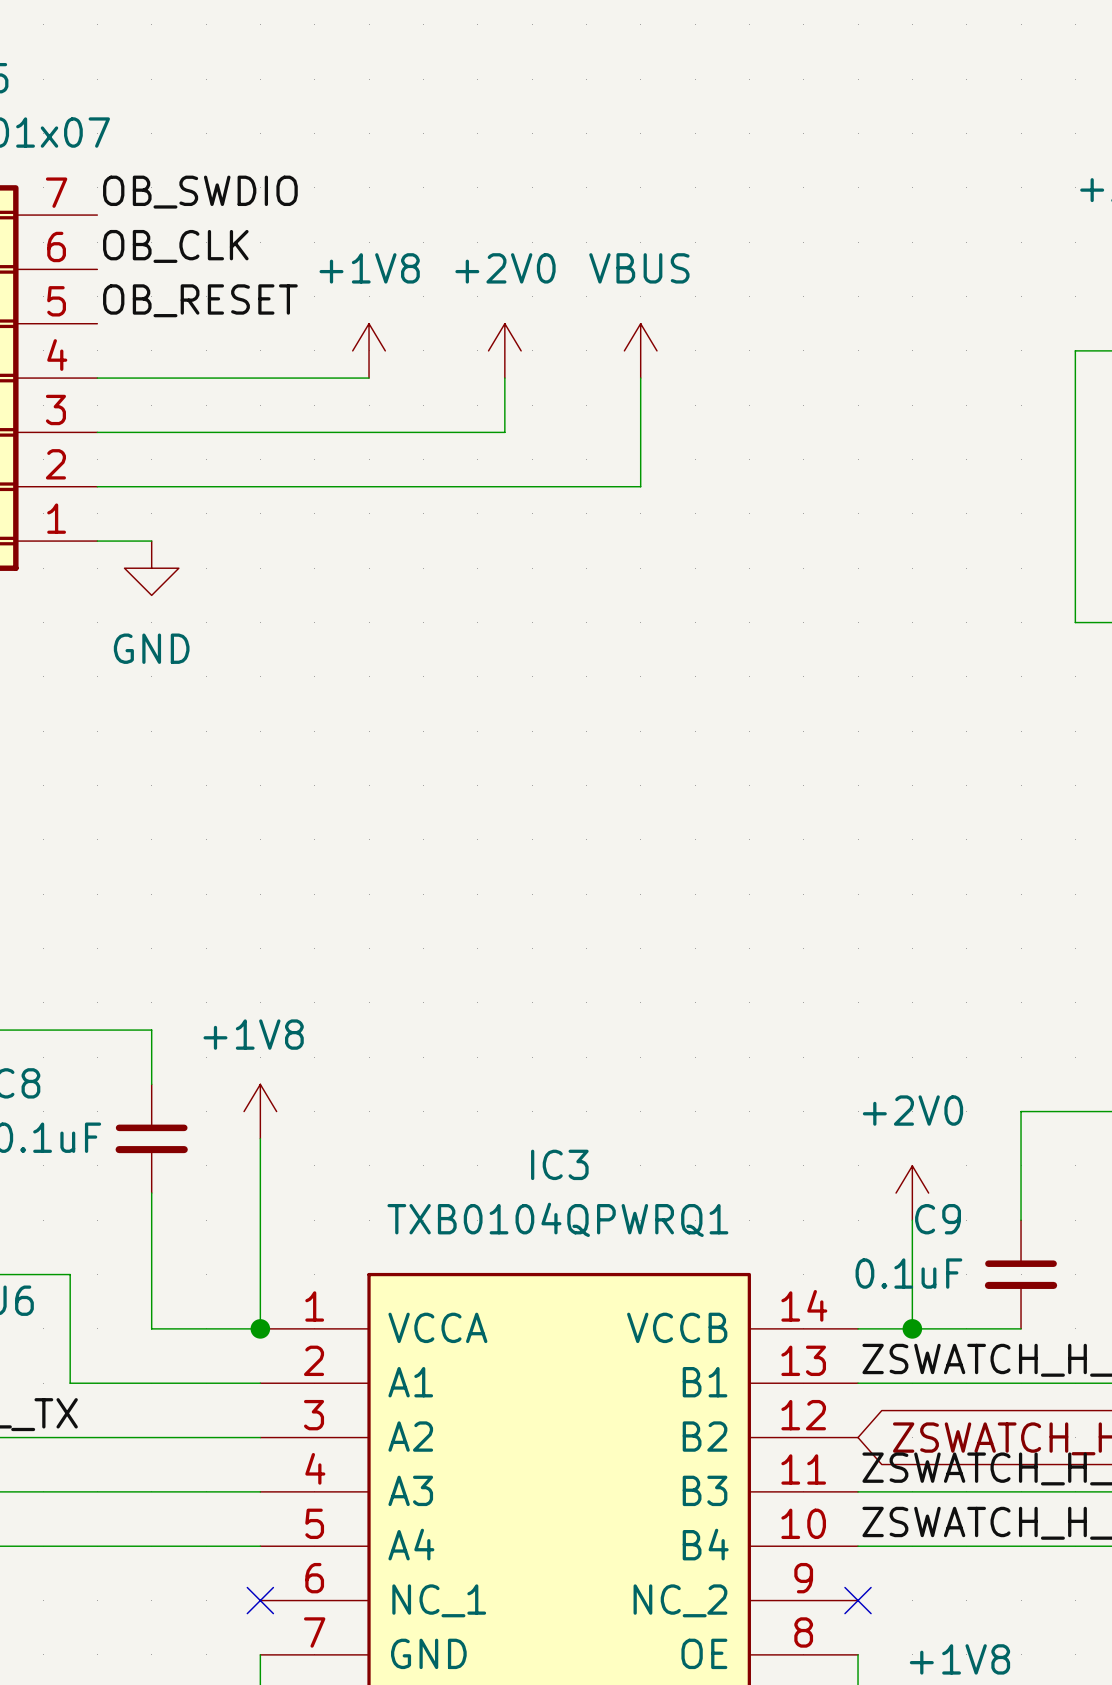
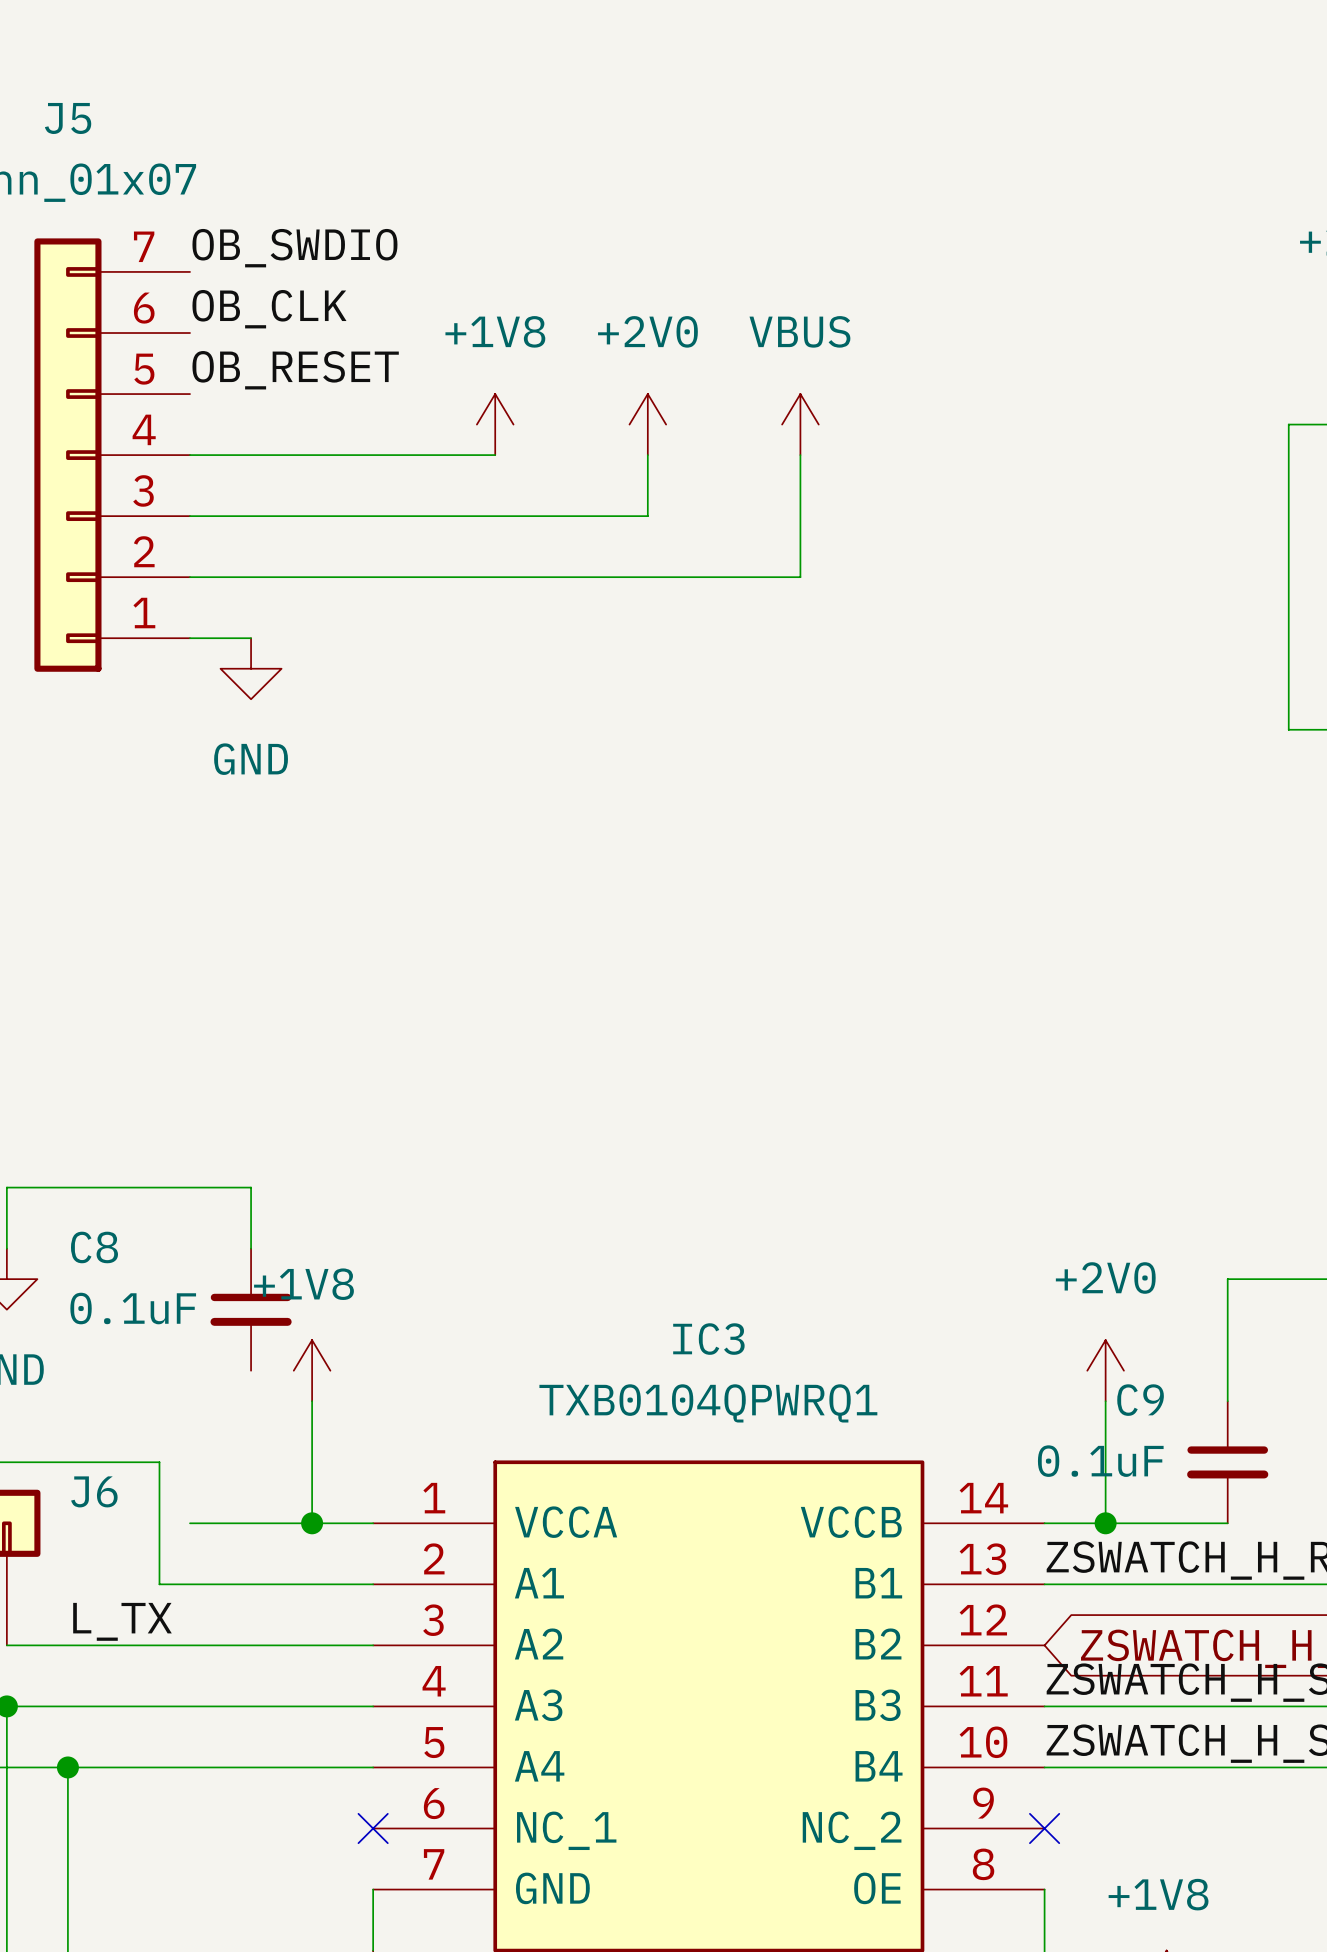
power symbol position: +1V8 (260, 1111) -> +1V8 (312, 1370)
wire: (260, 1138) (260, 1328) -> none
wire: (151, 1193) (151, 1328) -> (190, 1523) (251, 1523)
wire: none -> (312, 1401) (312, 1523)
junction position: (260, 1328) -> (312, 1523)

